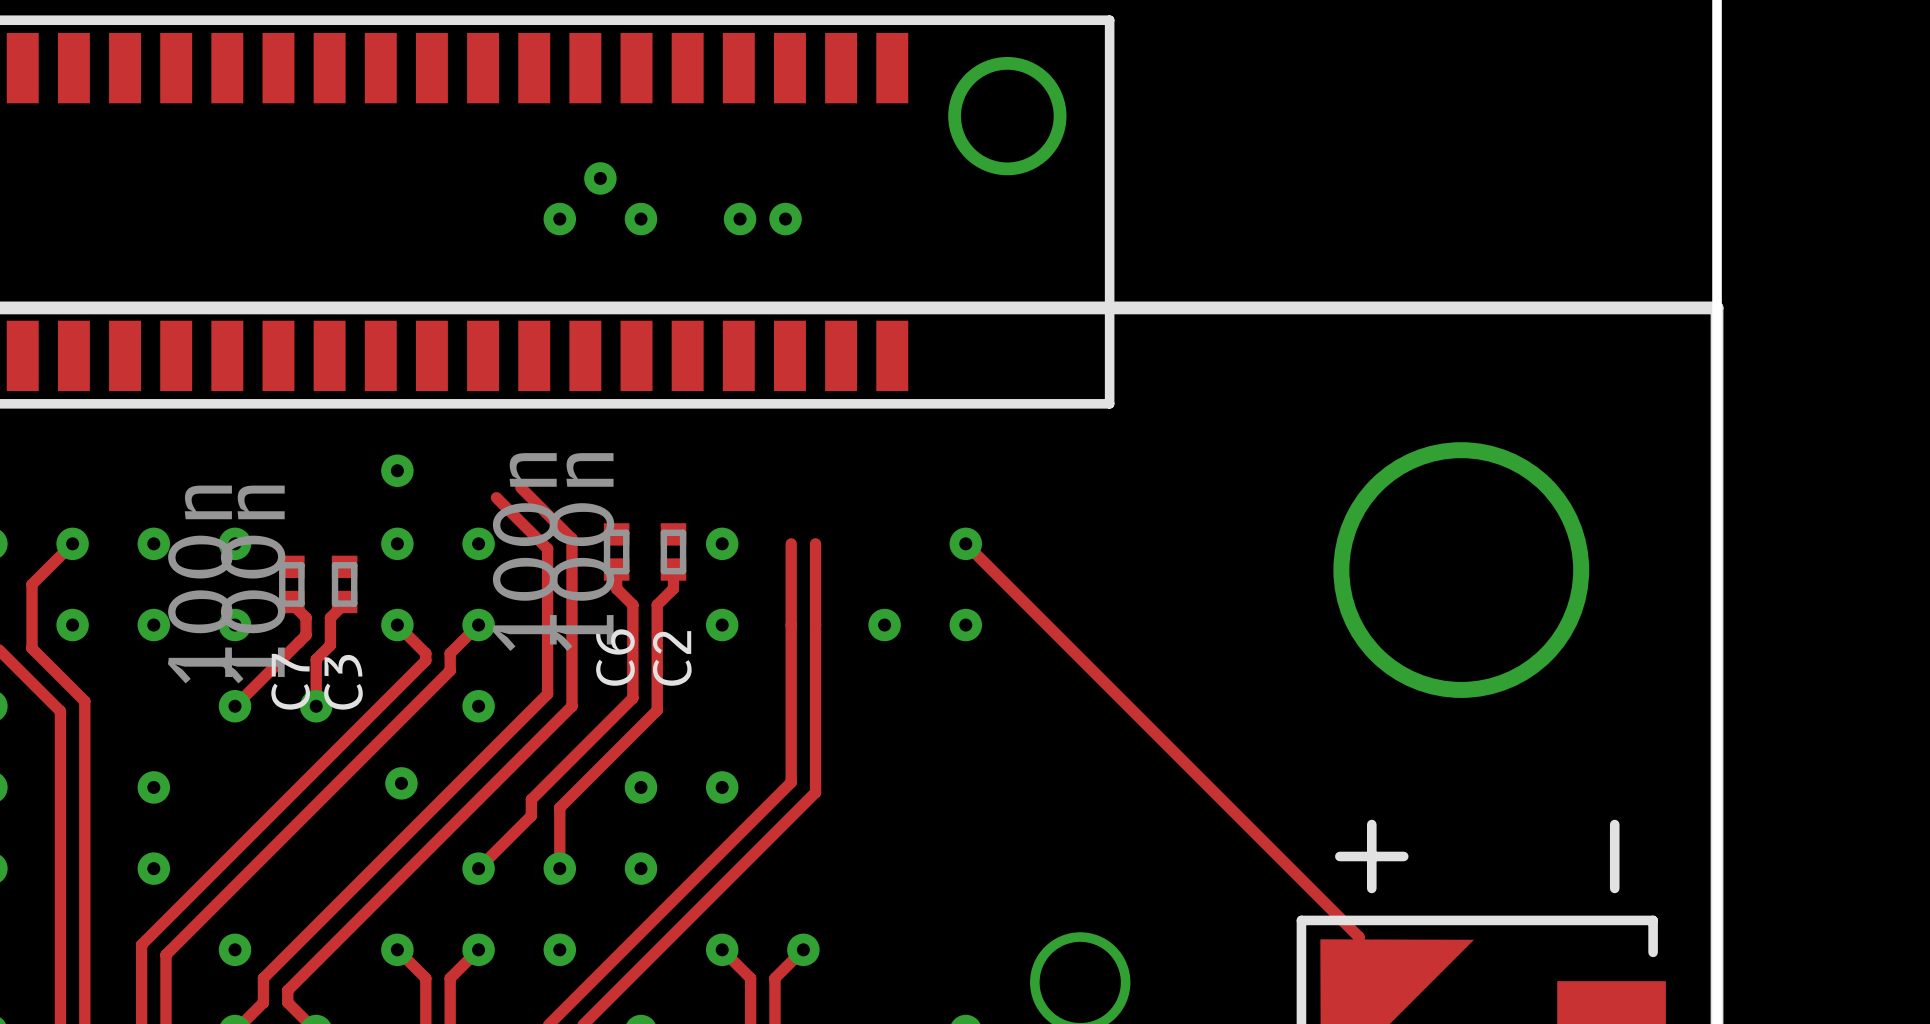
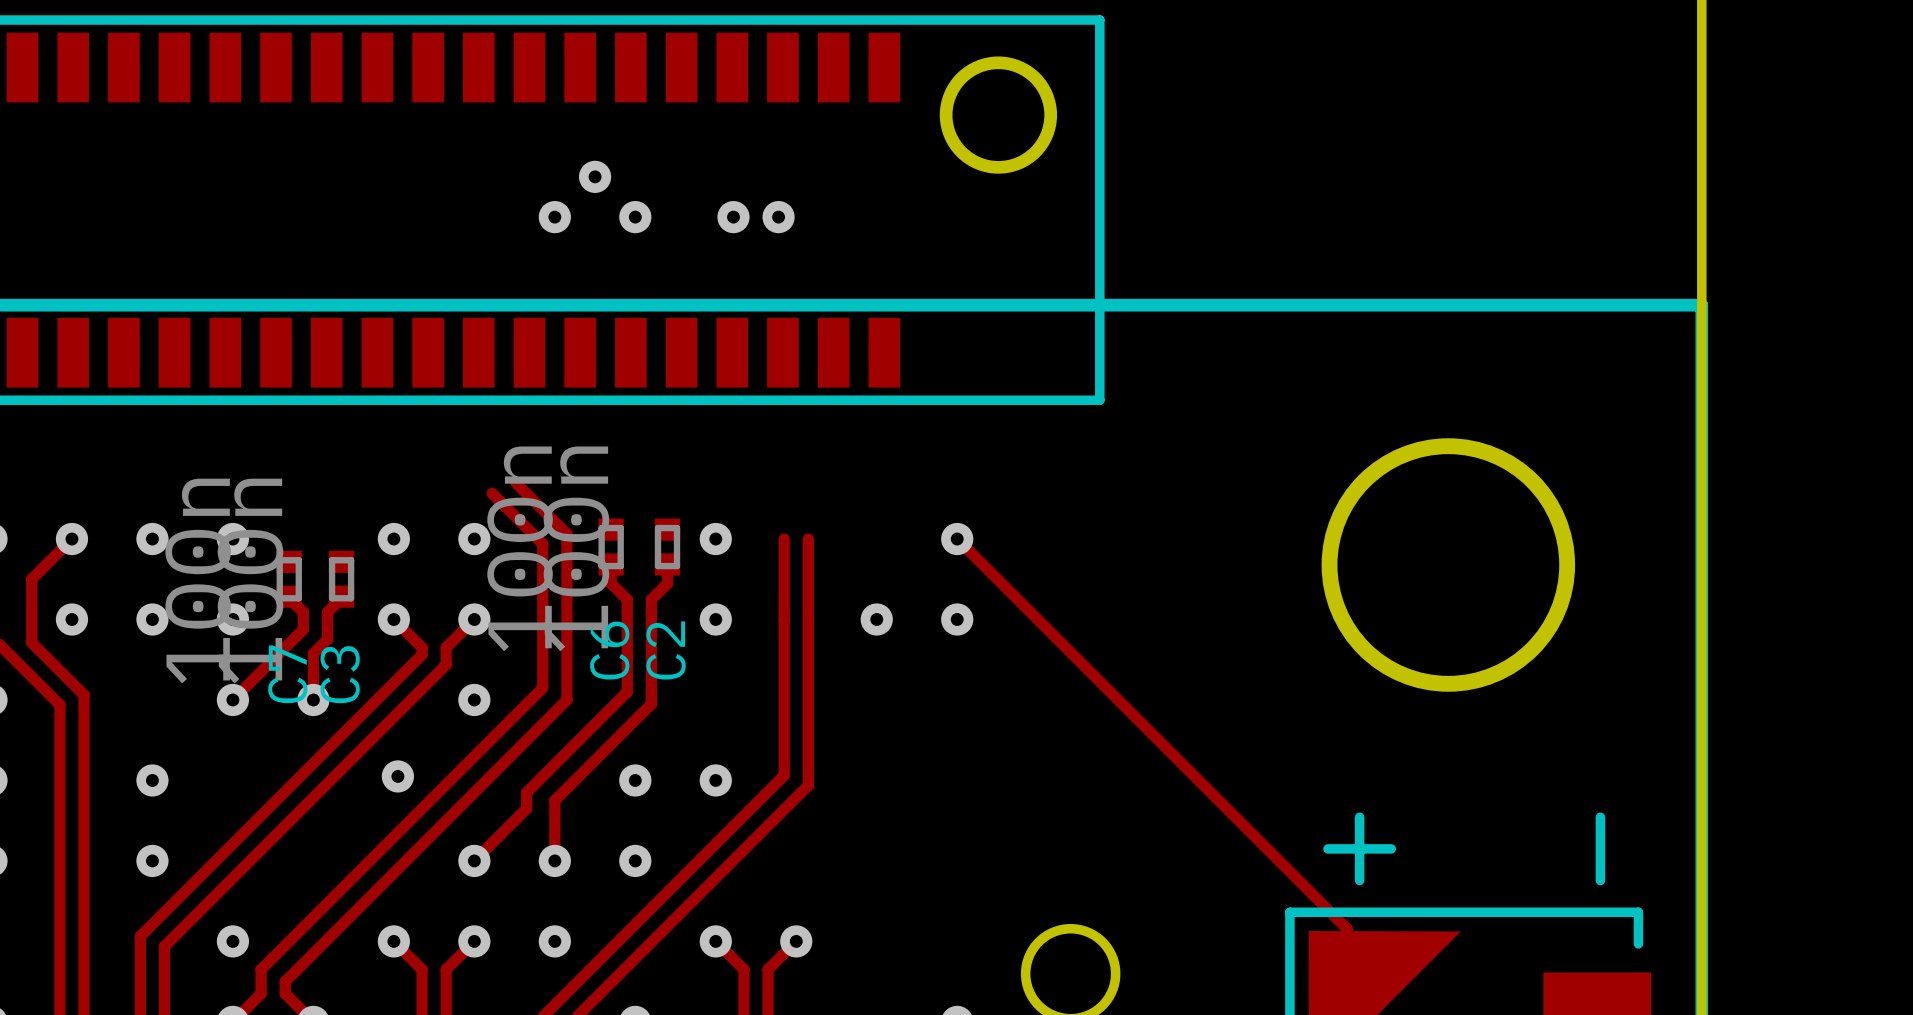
via: (397, 470) -> none

